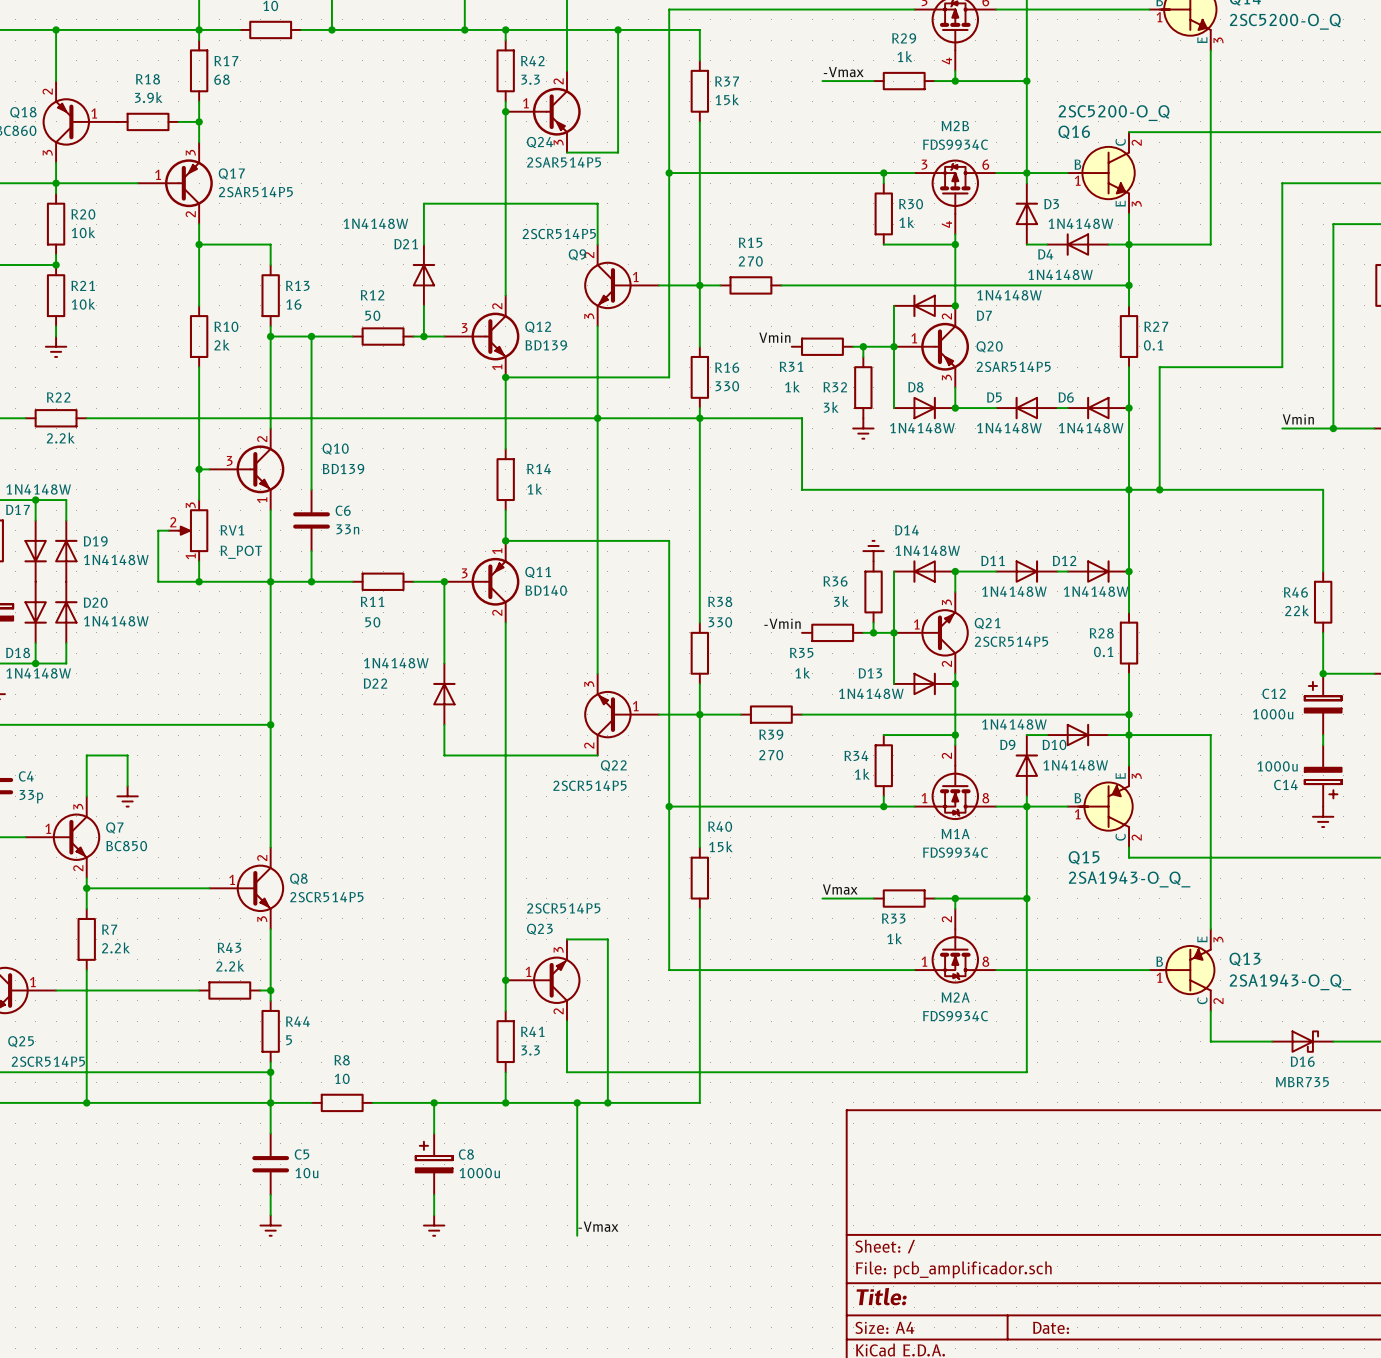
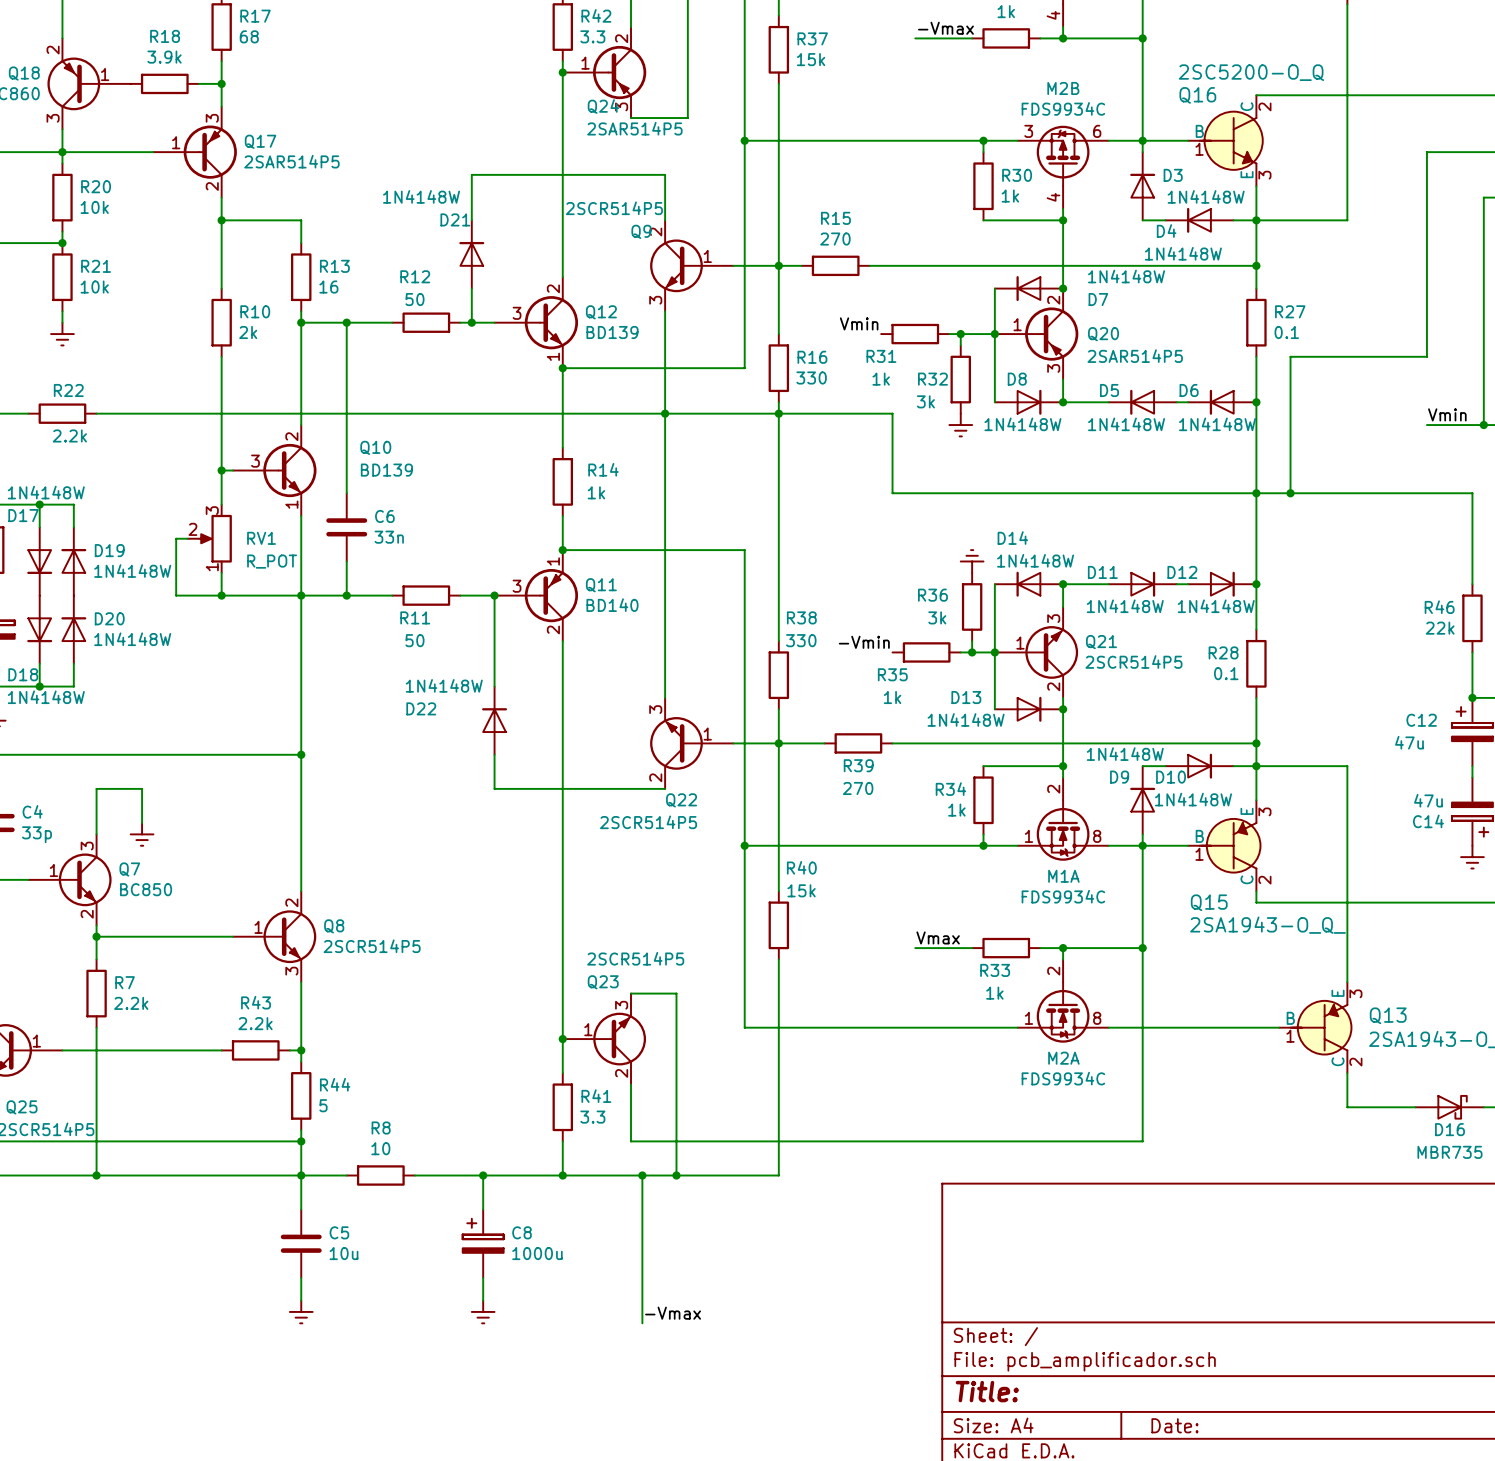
C12 value: 1000u (1273, 714) -> 47u (1409, 742)
C14 value: 1000u (1277, 766) -> 47u (1428, 800)

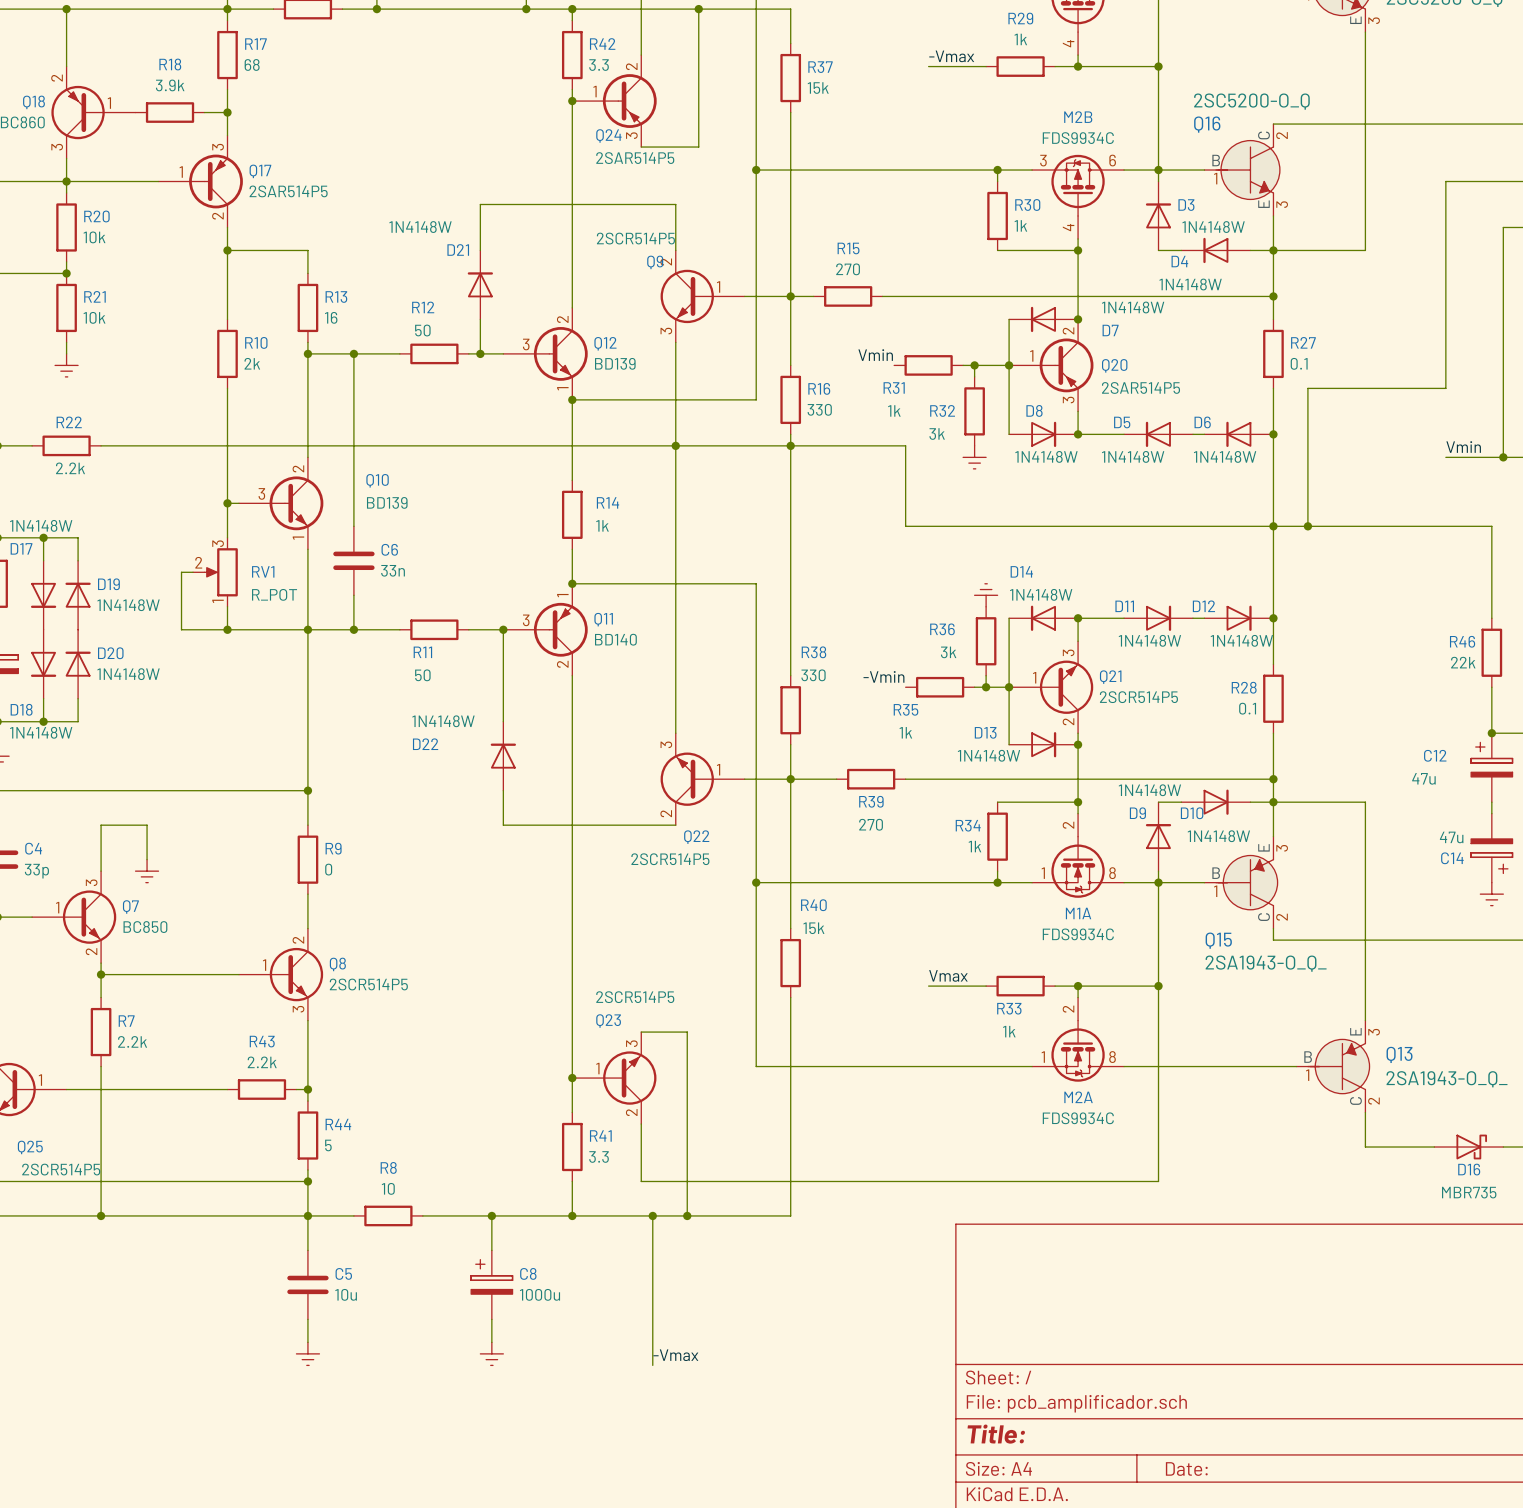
wire: (301, 788) (301, 857) -> none
R9: none -> 0 (307, 859)

